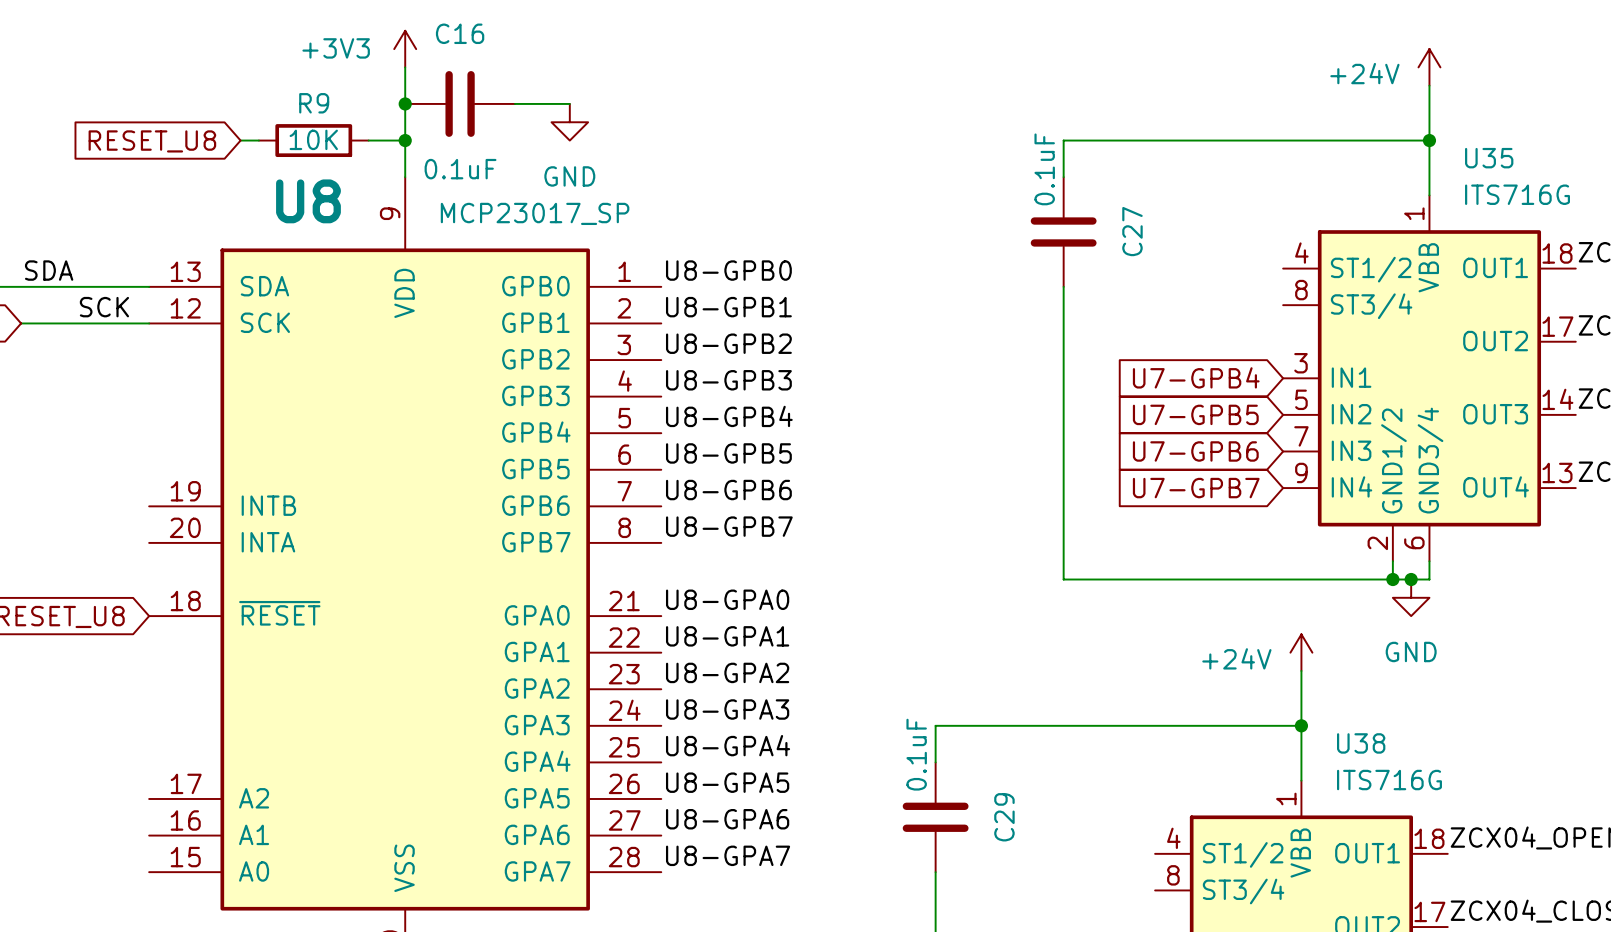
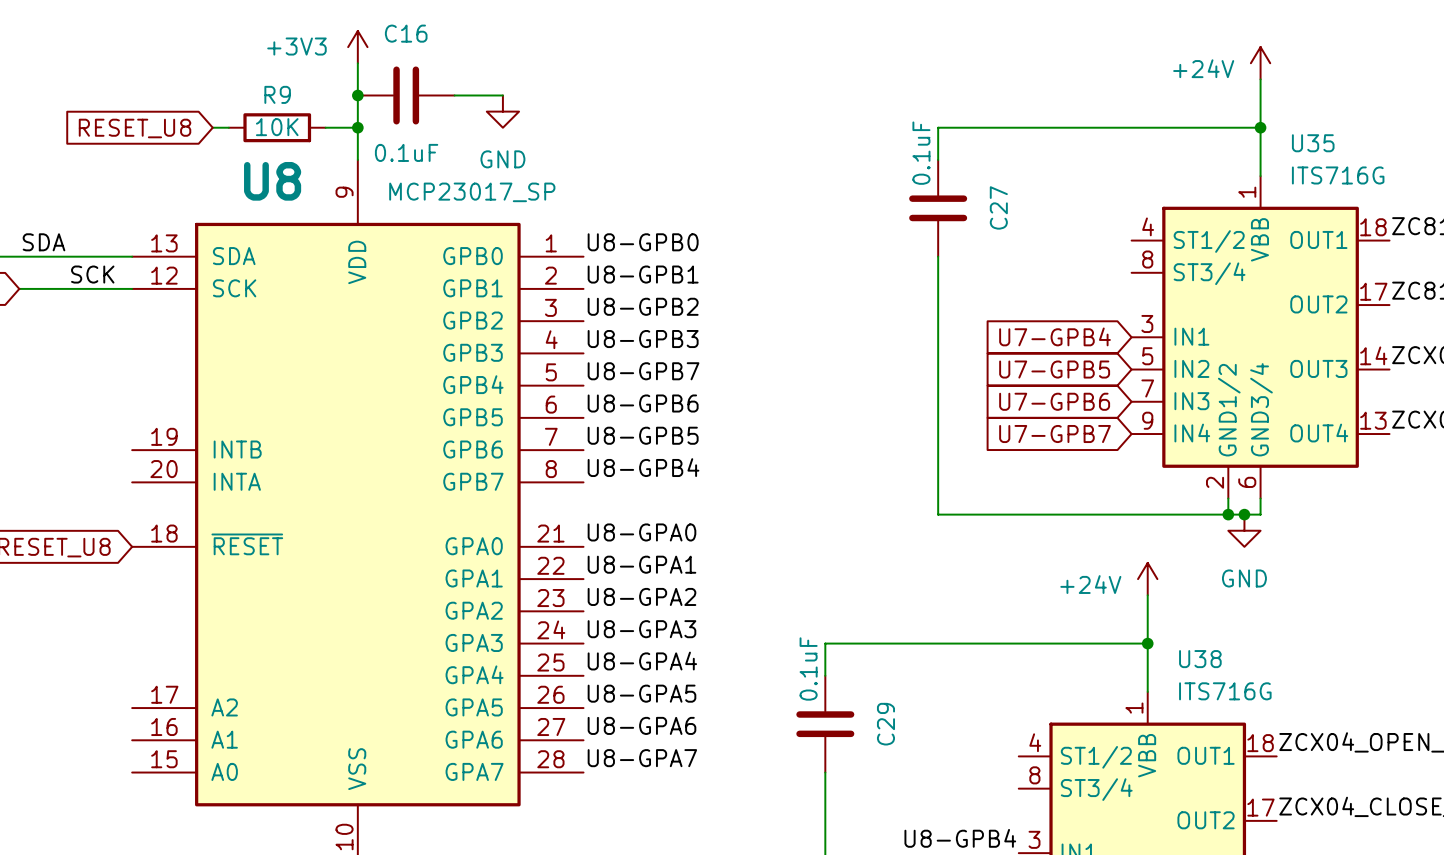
label: U8-GPB4 (729, 416) -> U8-GPB7 (643, 371)
label: U8-GPB5 (728, 453) -> U8-GPB6 (643, 403)
label: U8-GPB6 (728, 490) -> U8-GPB5 (643, 435)
label: U8-GPB7 (729, 526) -> U8-GPB4 (643, 467)

